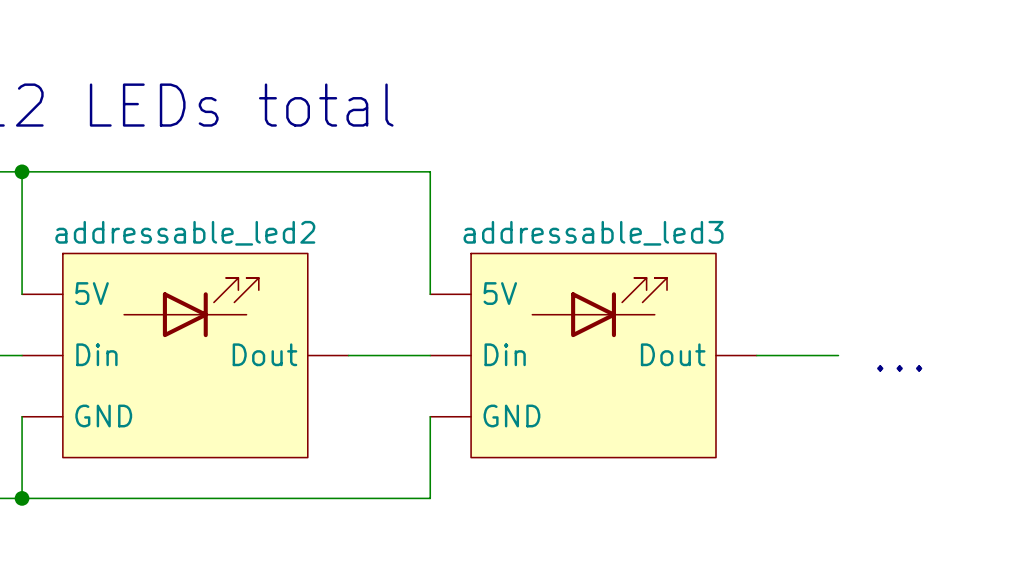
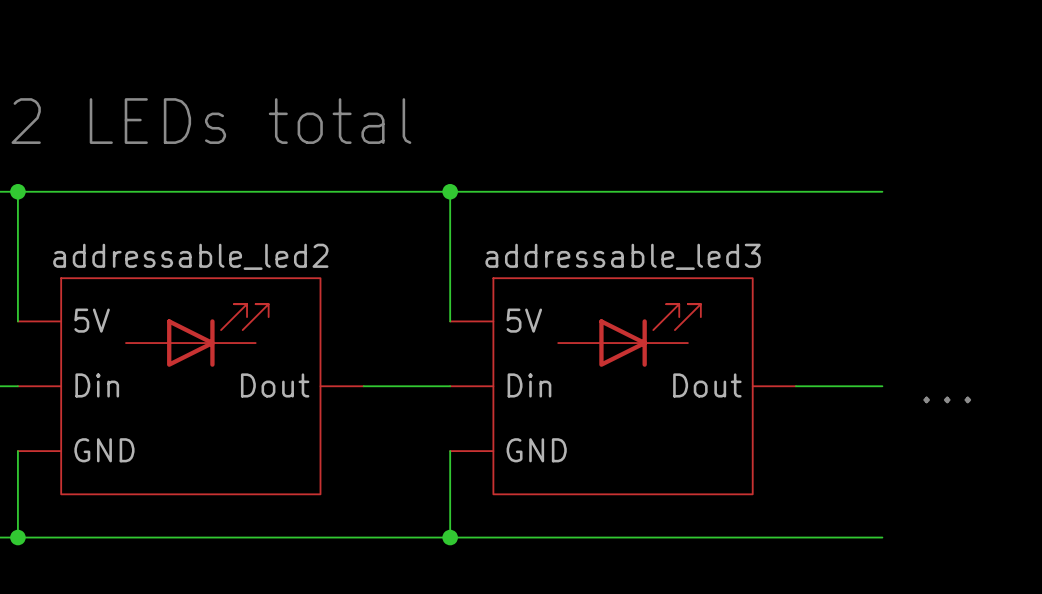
wire: none -> (450, 191) (882, 191)
junction: none -> (450, 191)
wire: none -> (450, 537) (882, 537)
junction: none -> (450, 537)

